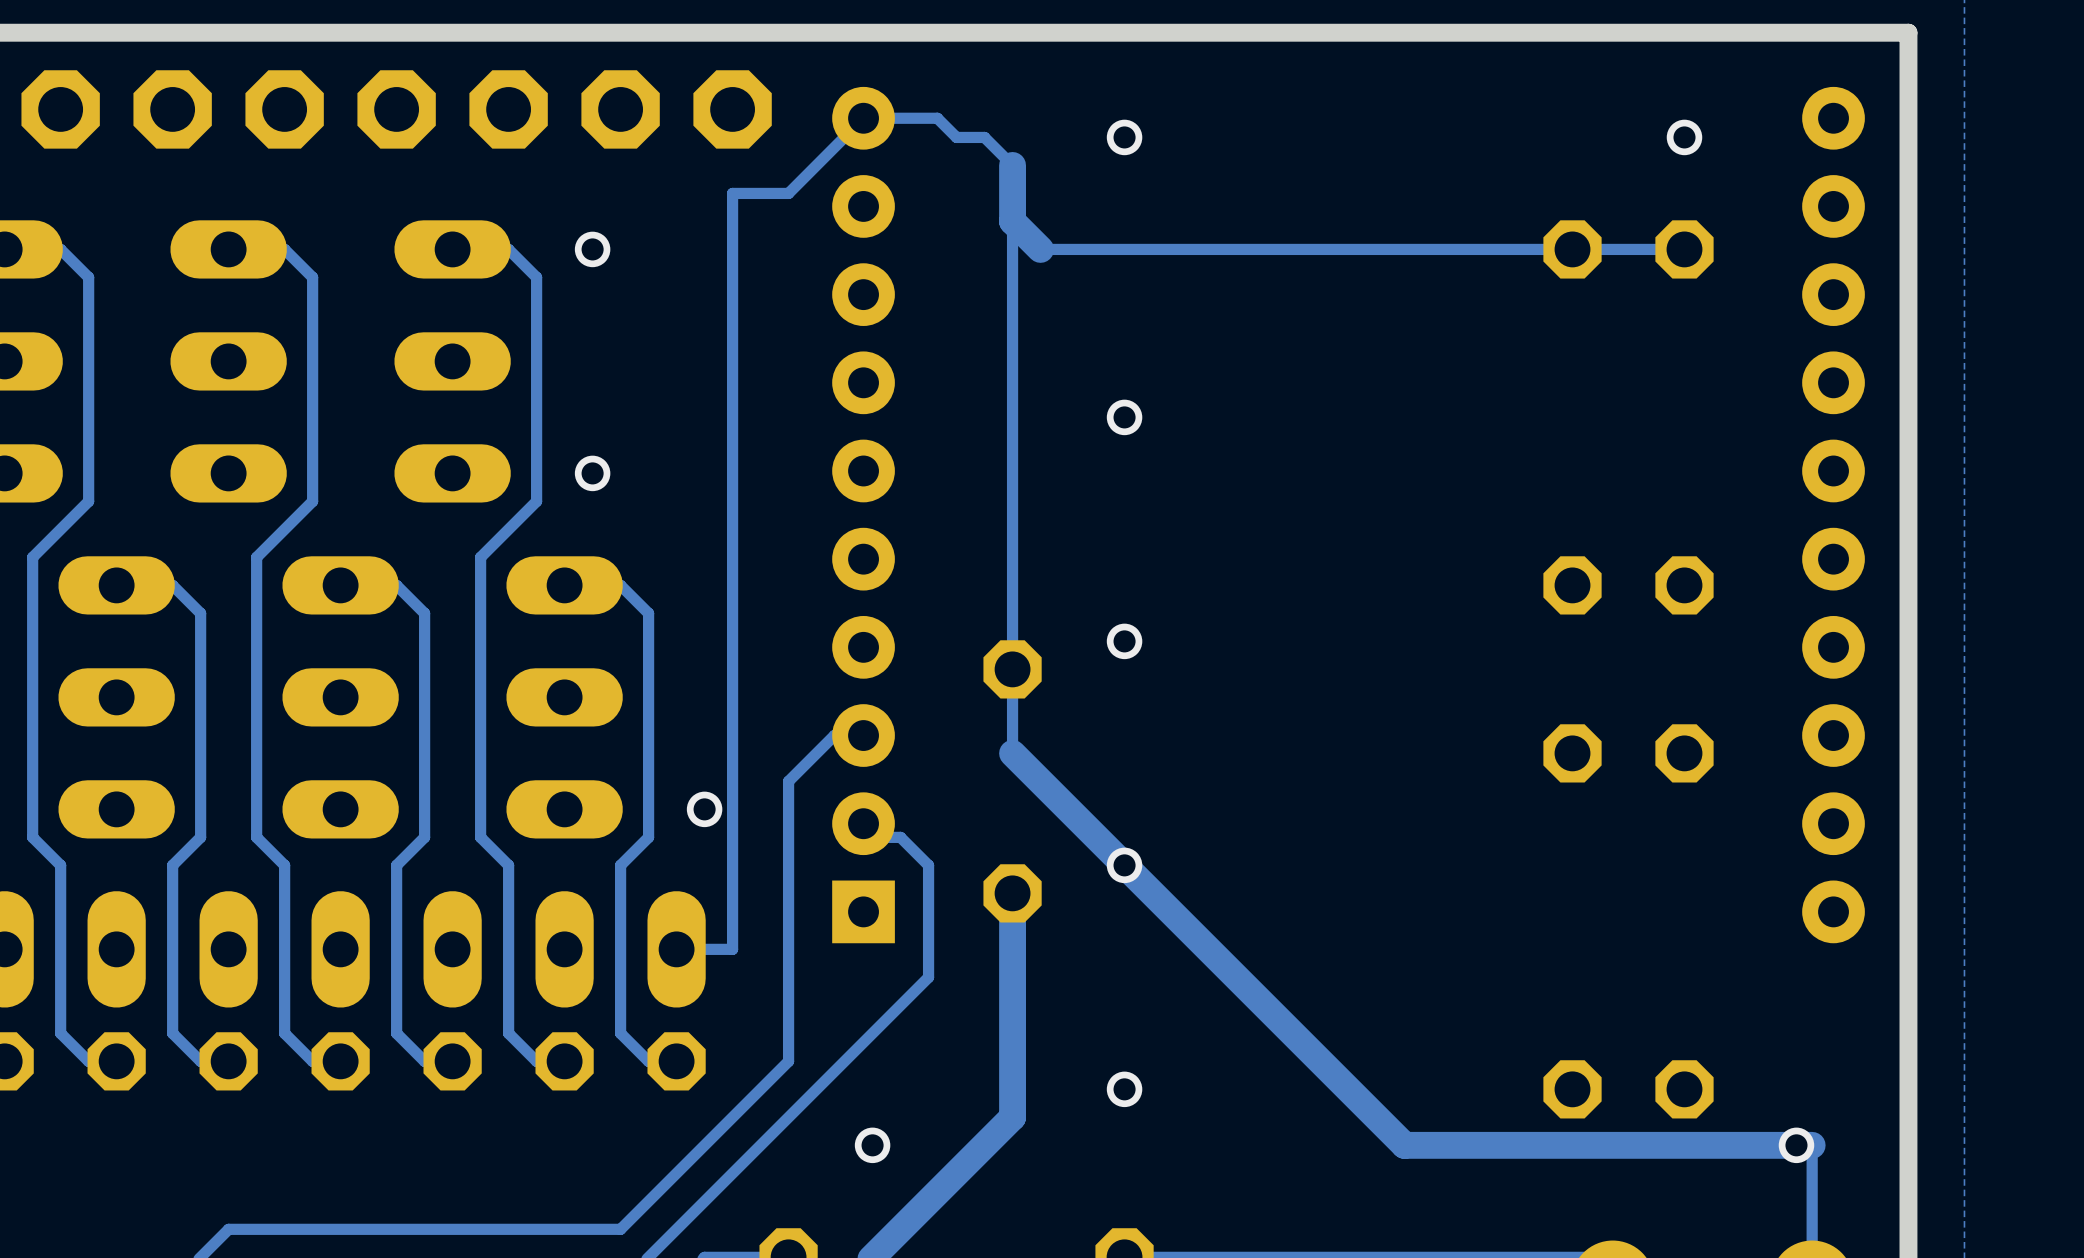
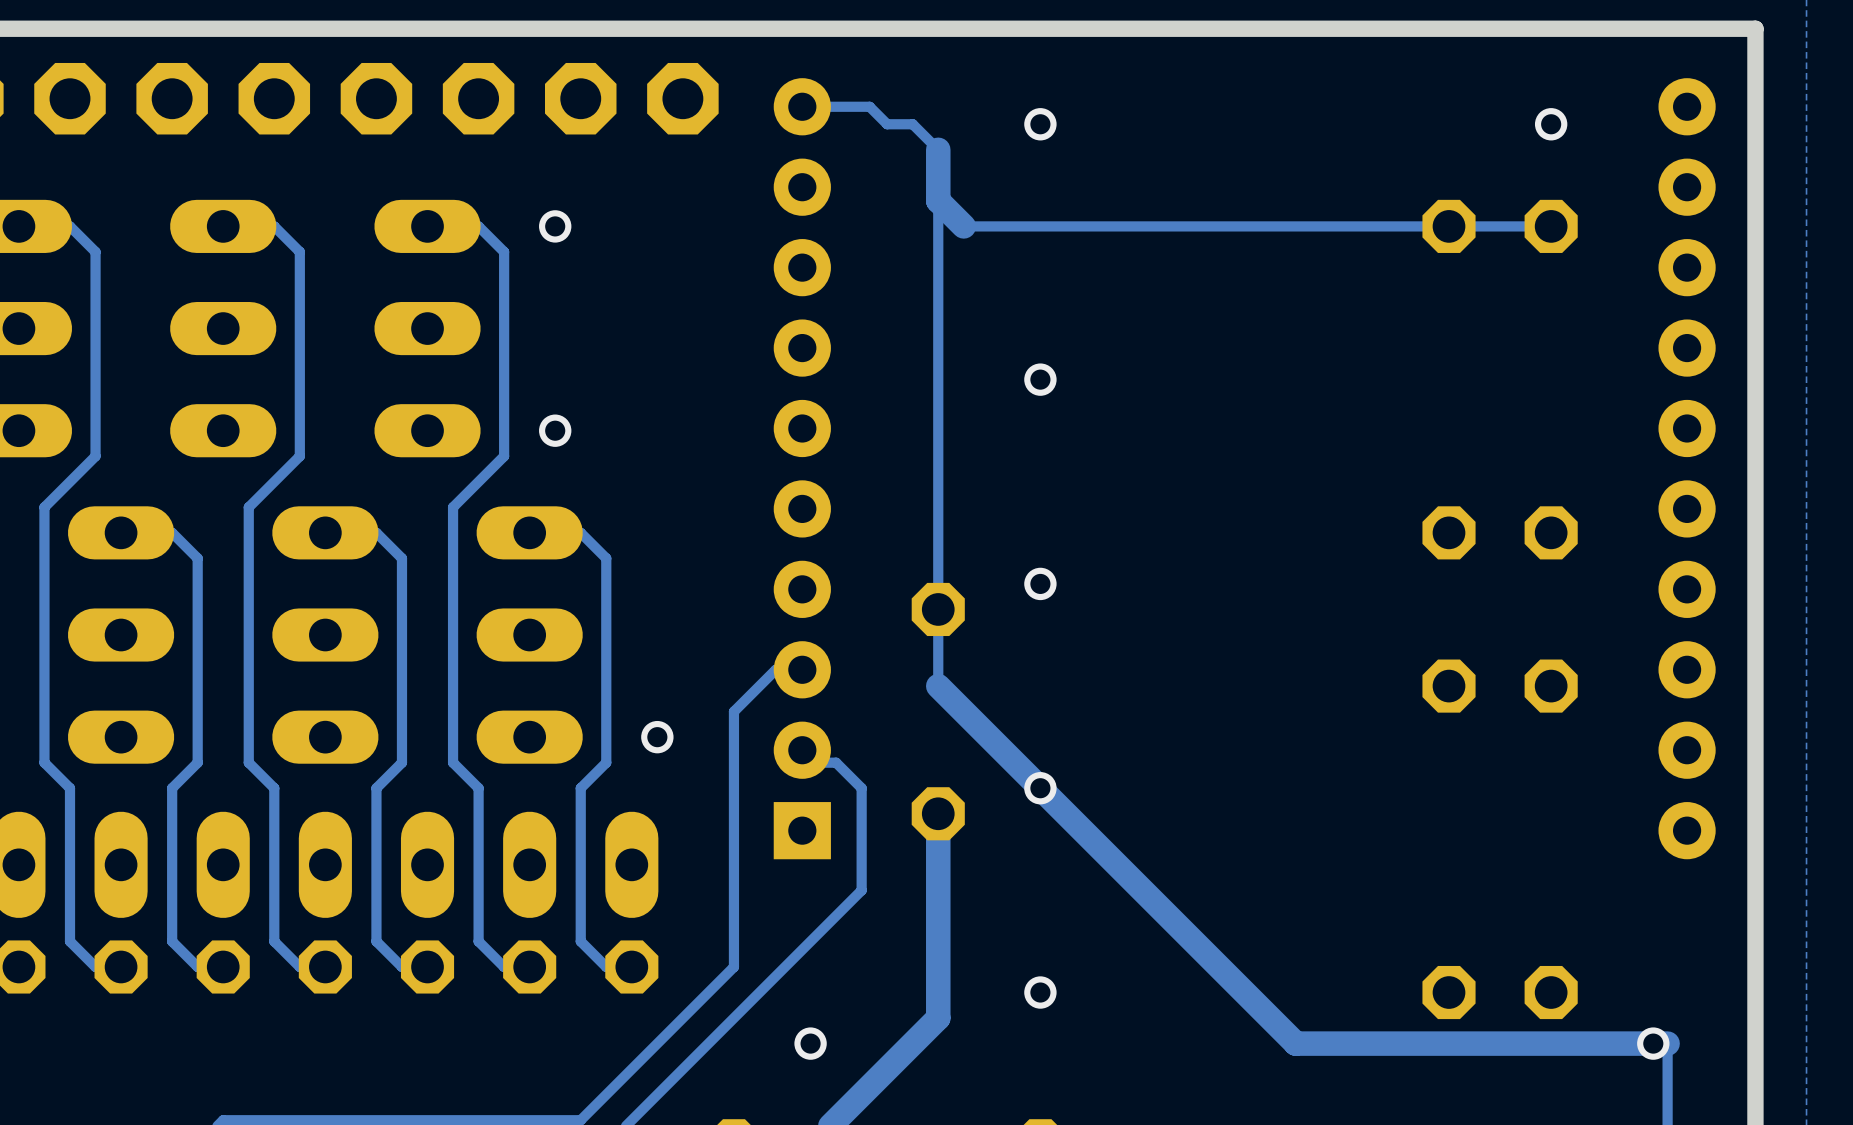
track: (863, 118) (788, 193) (732, 193) (732, 949) (676, 949) -> none

